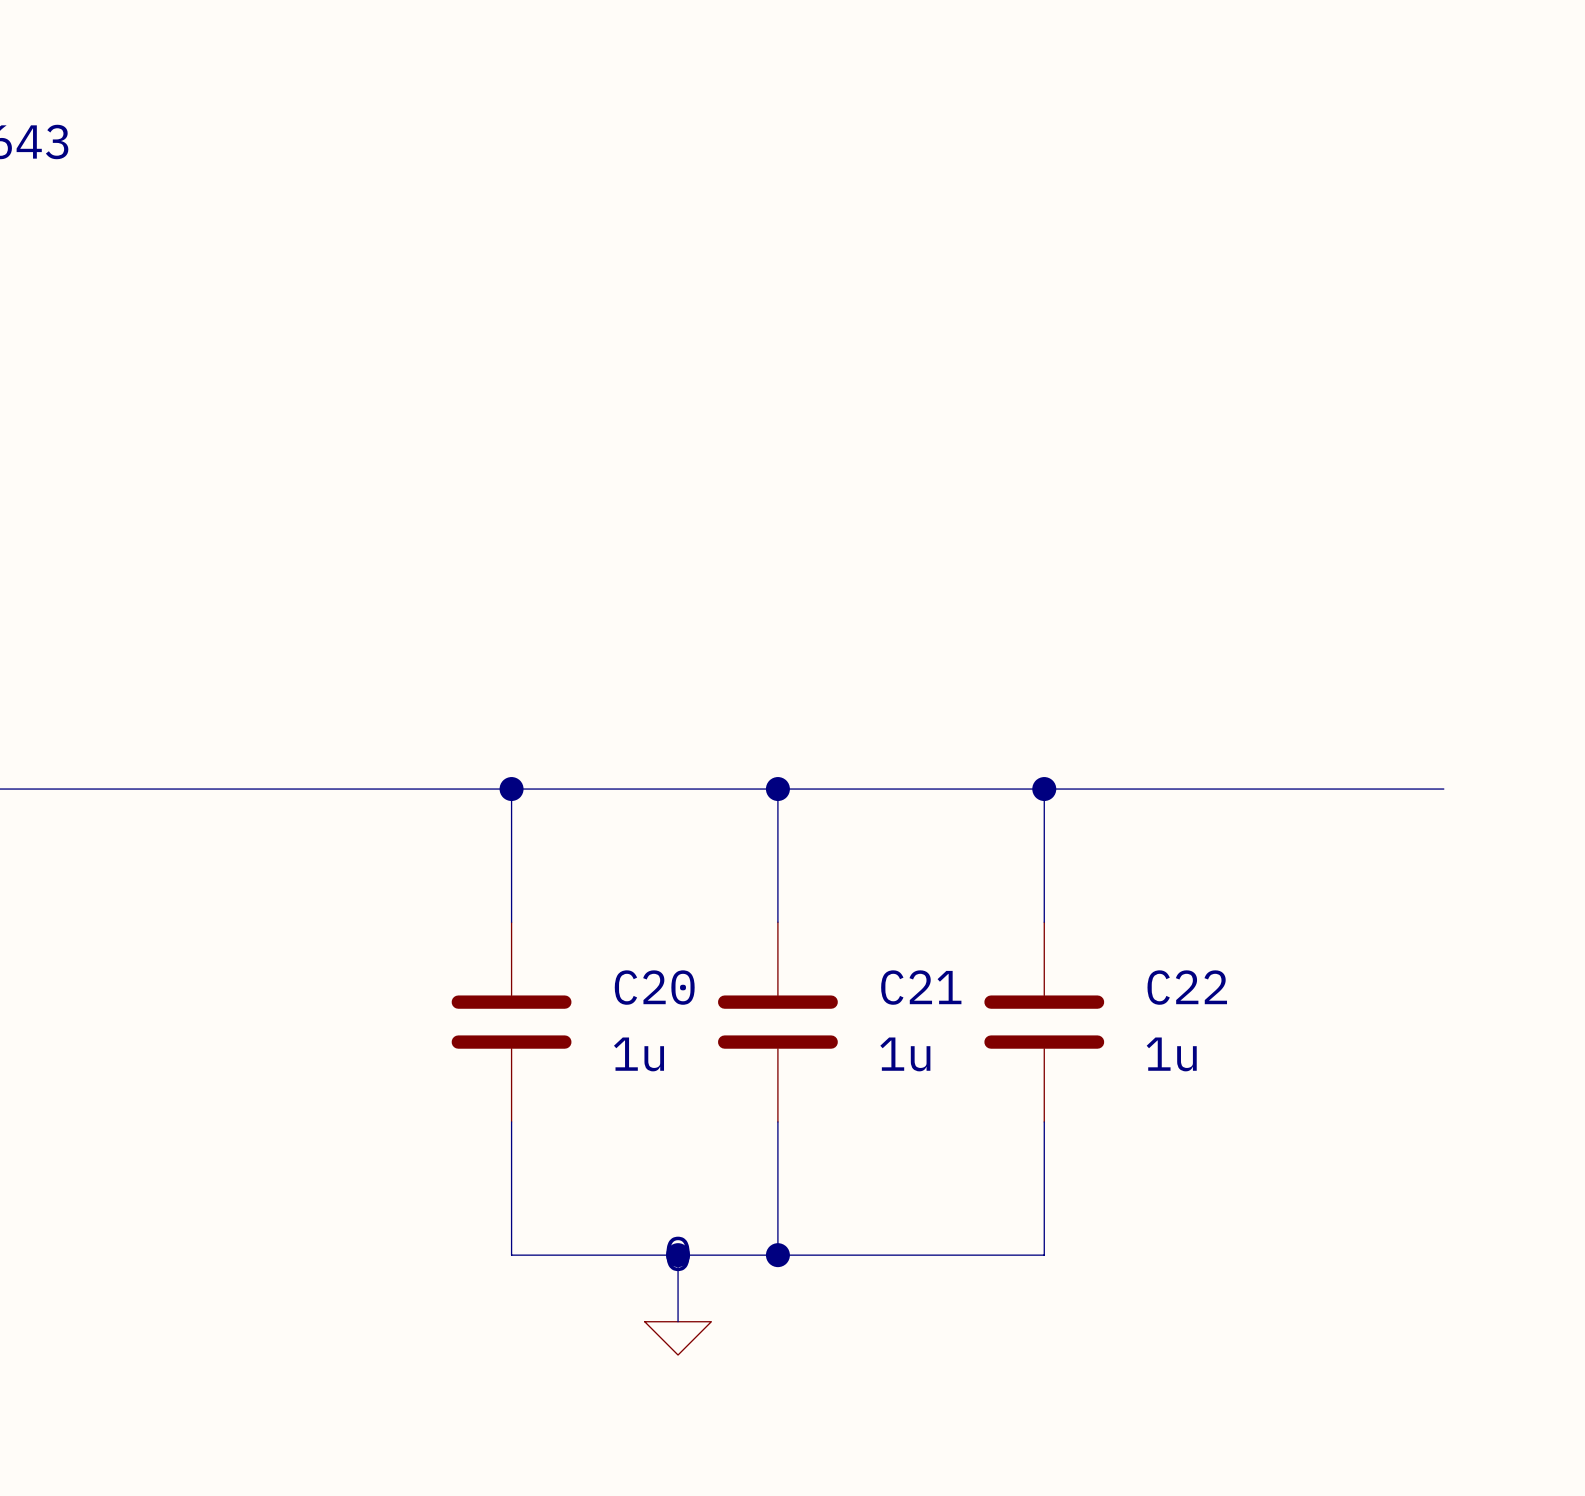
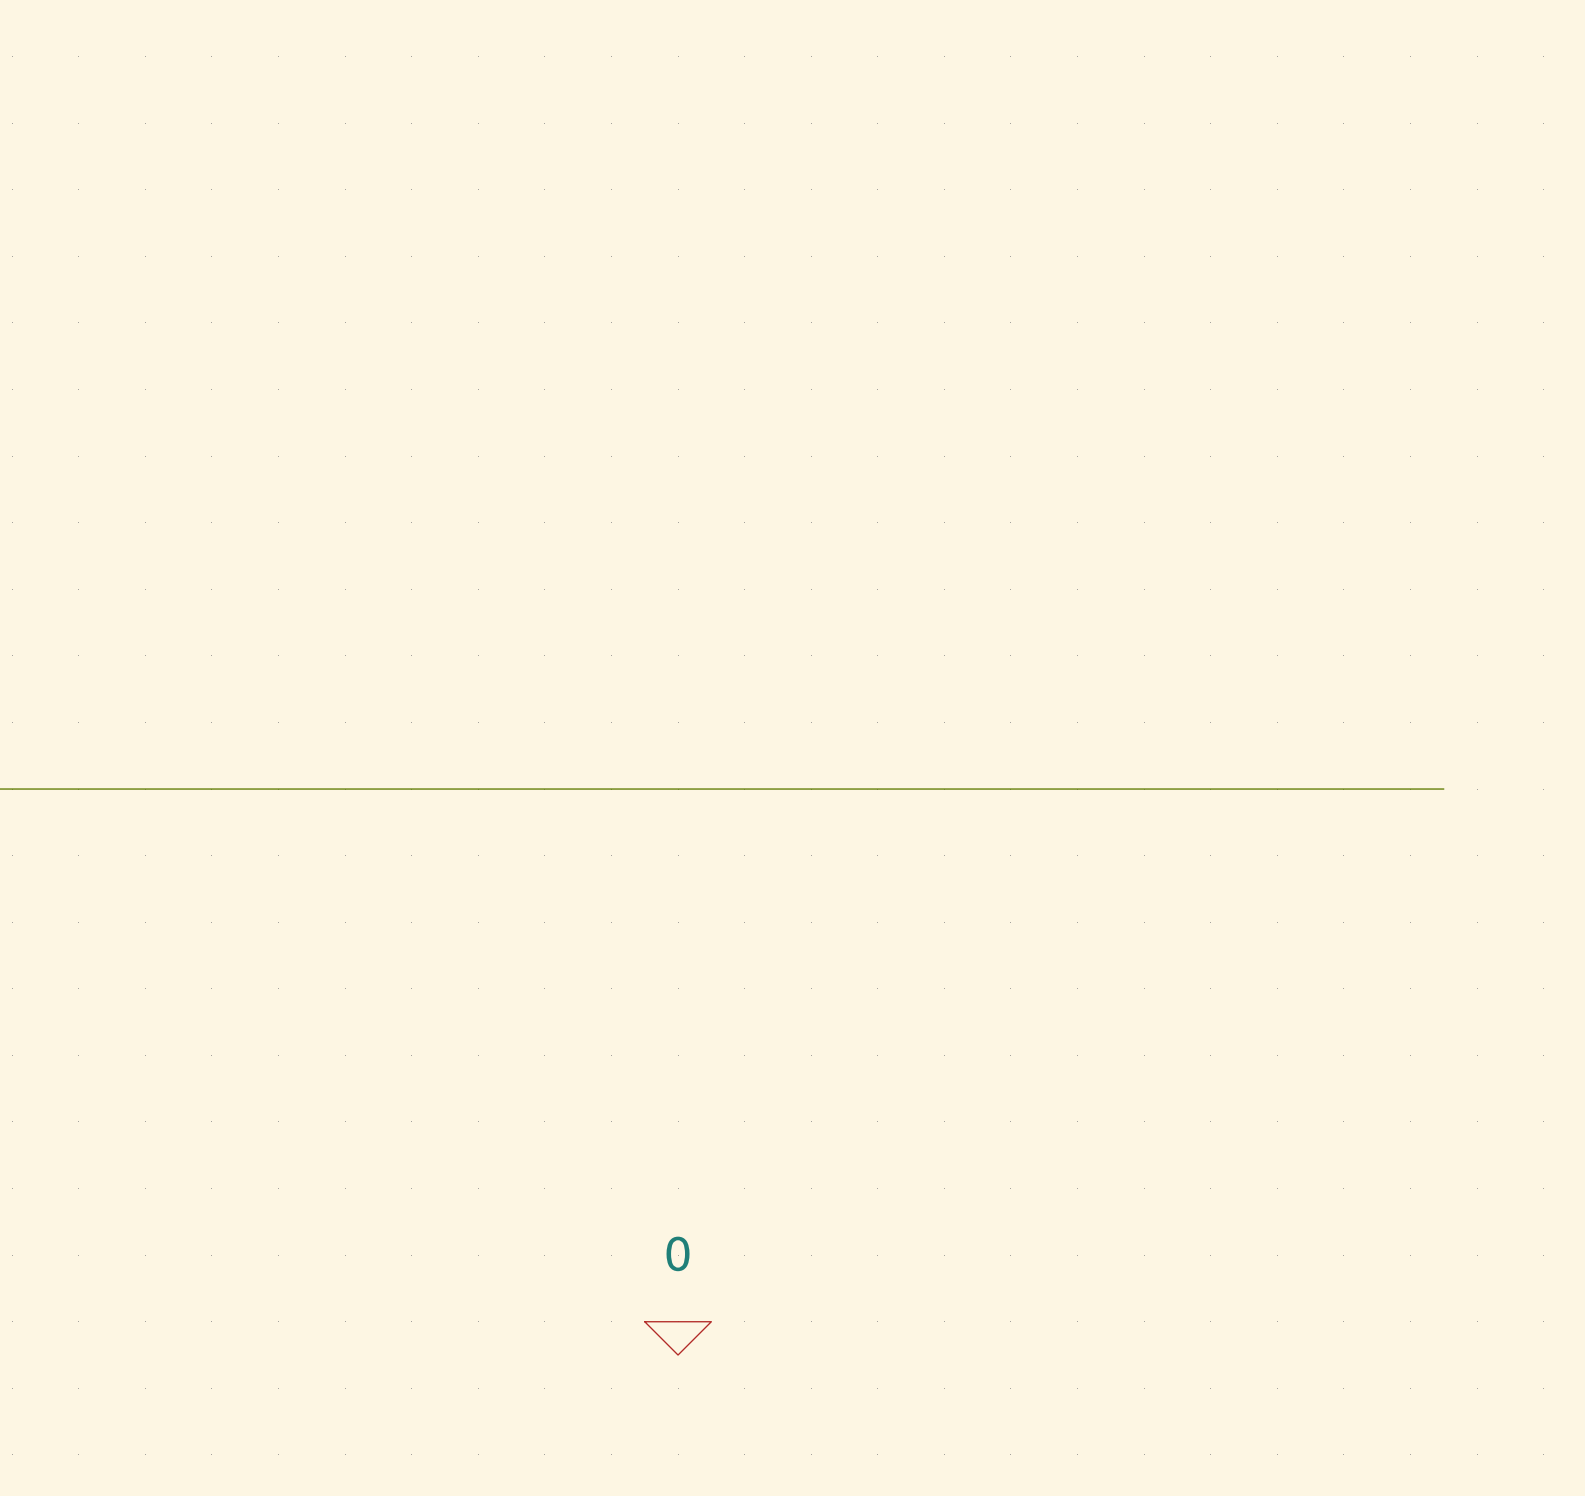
wire: (511, 789) (511, 922) -> none
junction: (511, 789) -> none
wire: (777, 789) (777, 922) -> none
junction: (777, 789) -> none
wire: (1044, 789) (1044, 922) -> none
junction: (1044, 789) -> none
C20: 1u (511, 1022) -> none
C21: 1u (777, 1022) -> none
C22: 1u (1044, 1022) -> none
wire: (511, 1121) (511, 1255) (1044, 1255) (1044, 1121) -> none
wire: (777, 1121) (777, 1255) -> none
wire: (678, 1255) (678, 1321) -> none
junction: (678, 1255) -> none
junction: (777, 1255) -> none

